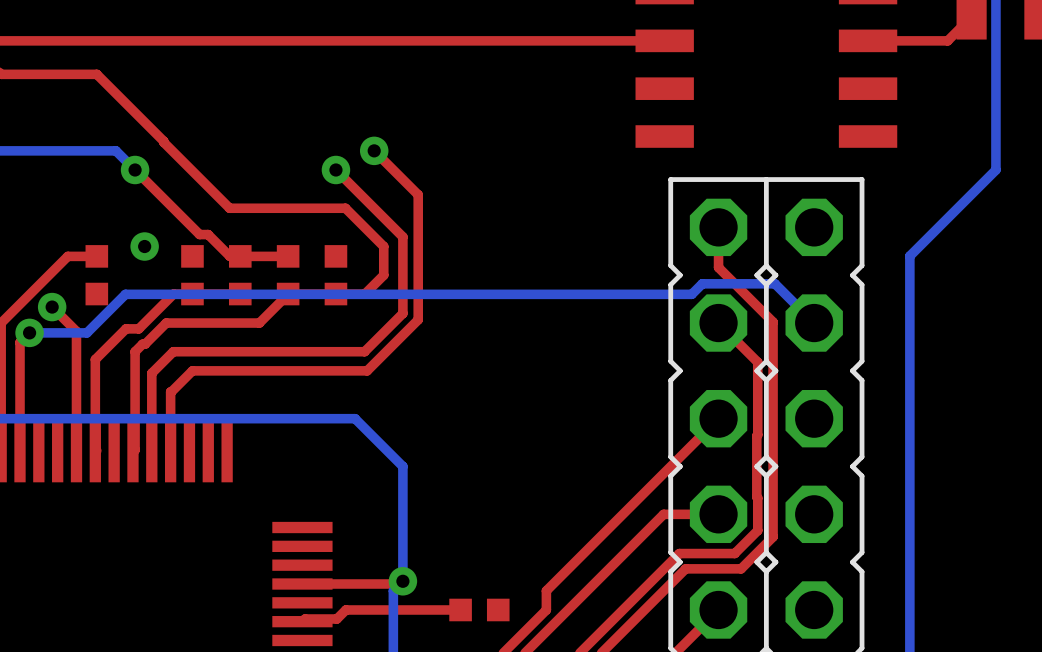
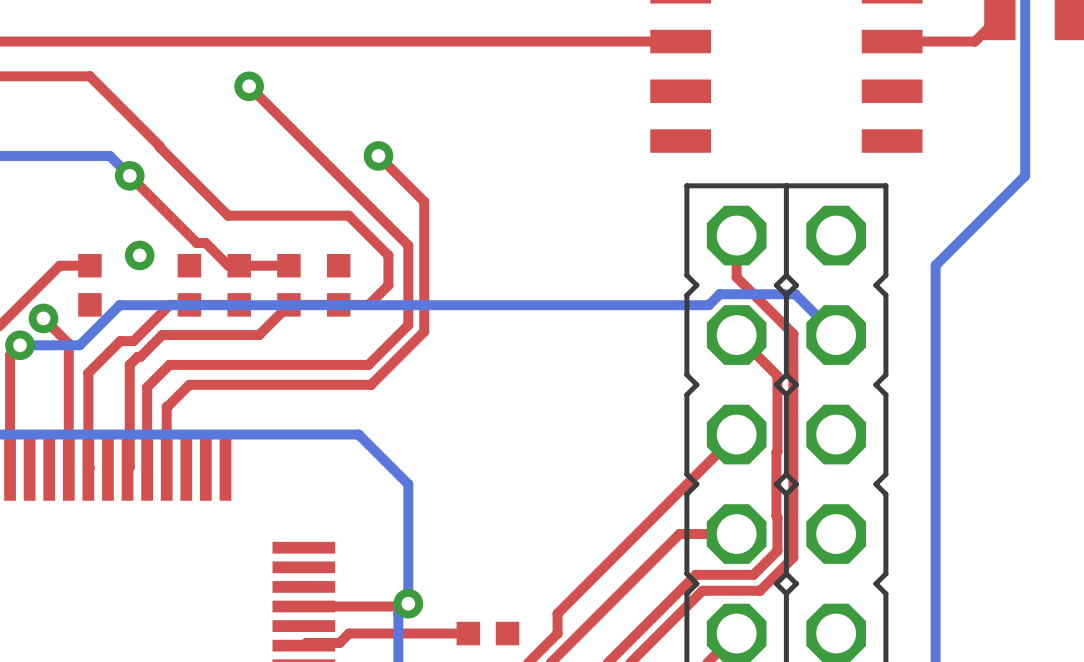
top track: none -> (249, 86) (338, 175)
via position: (335, 169) -> (249, 86)

